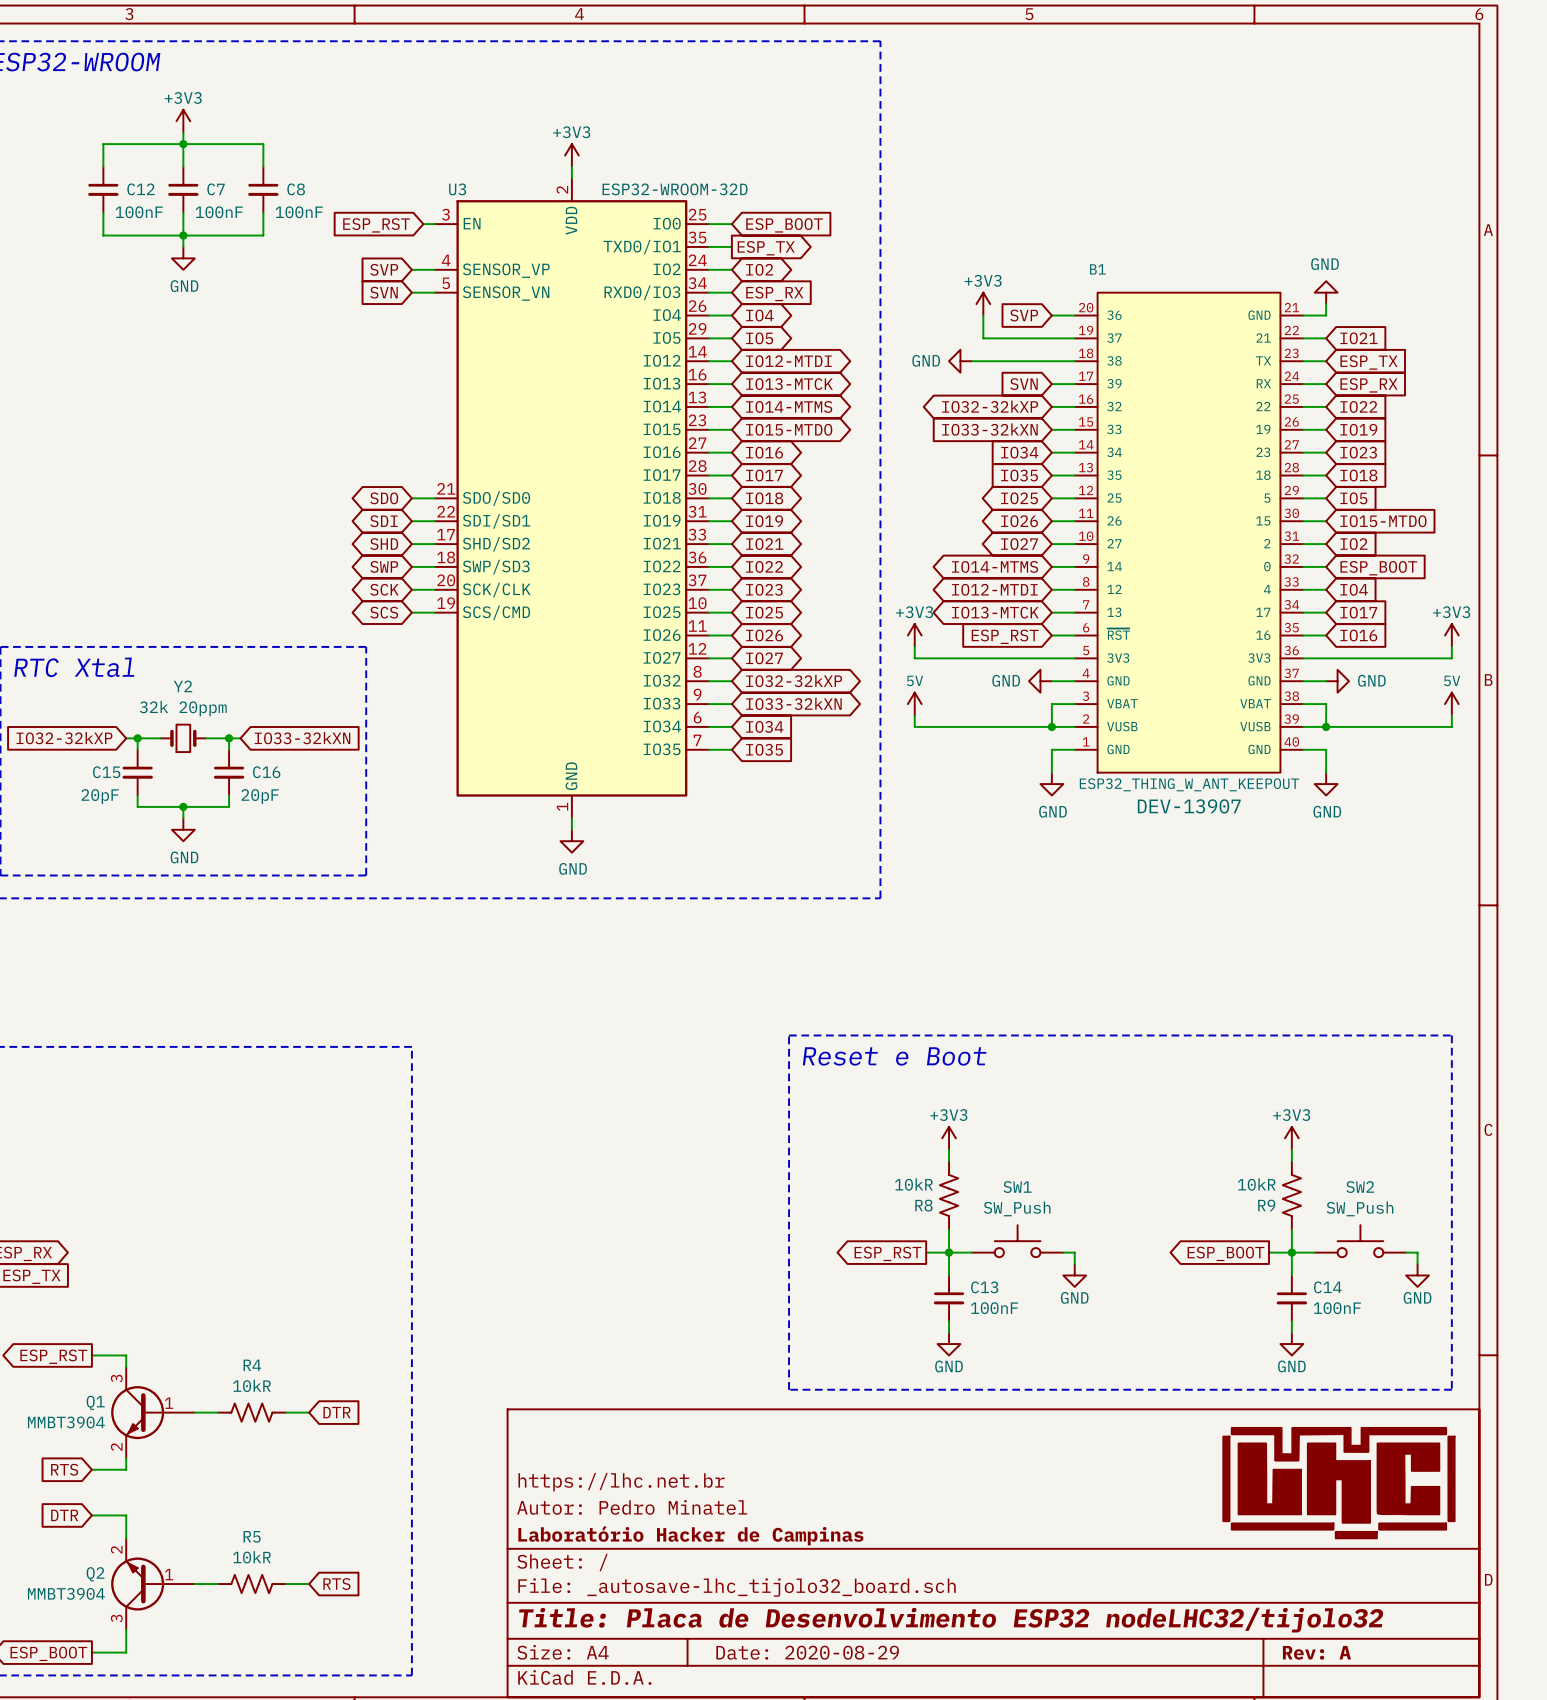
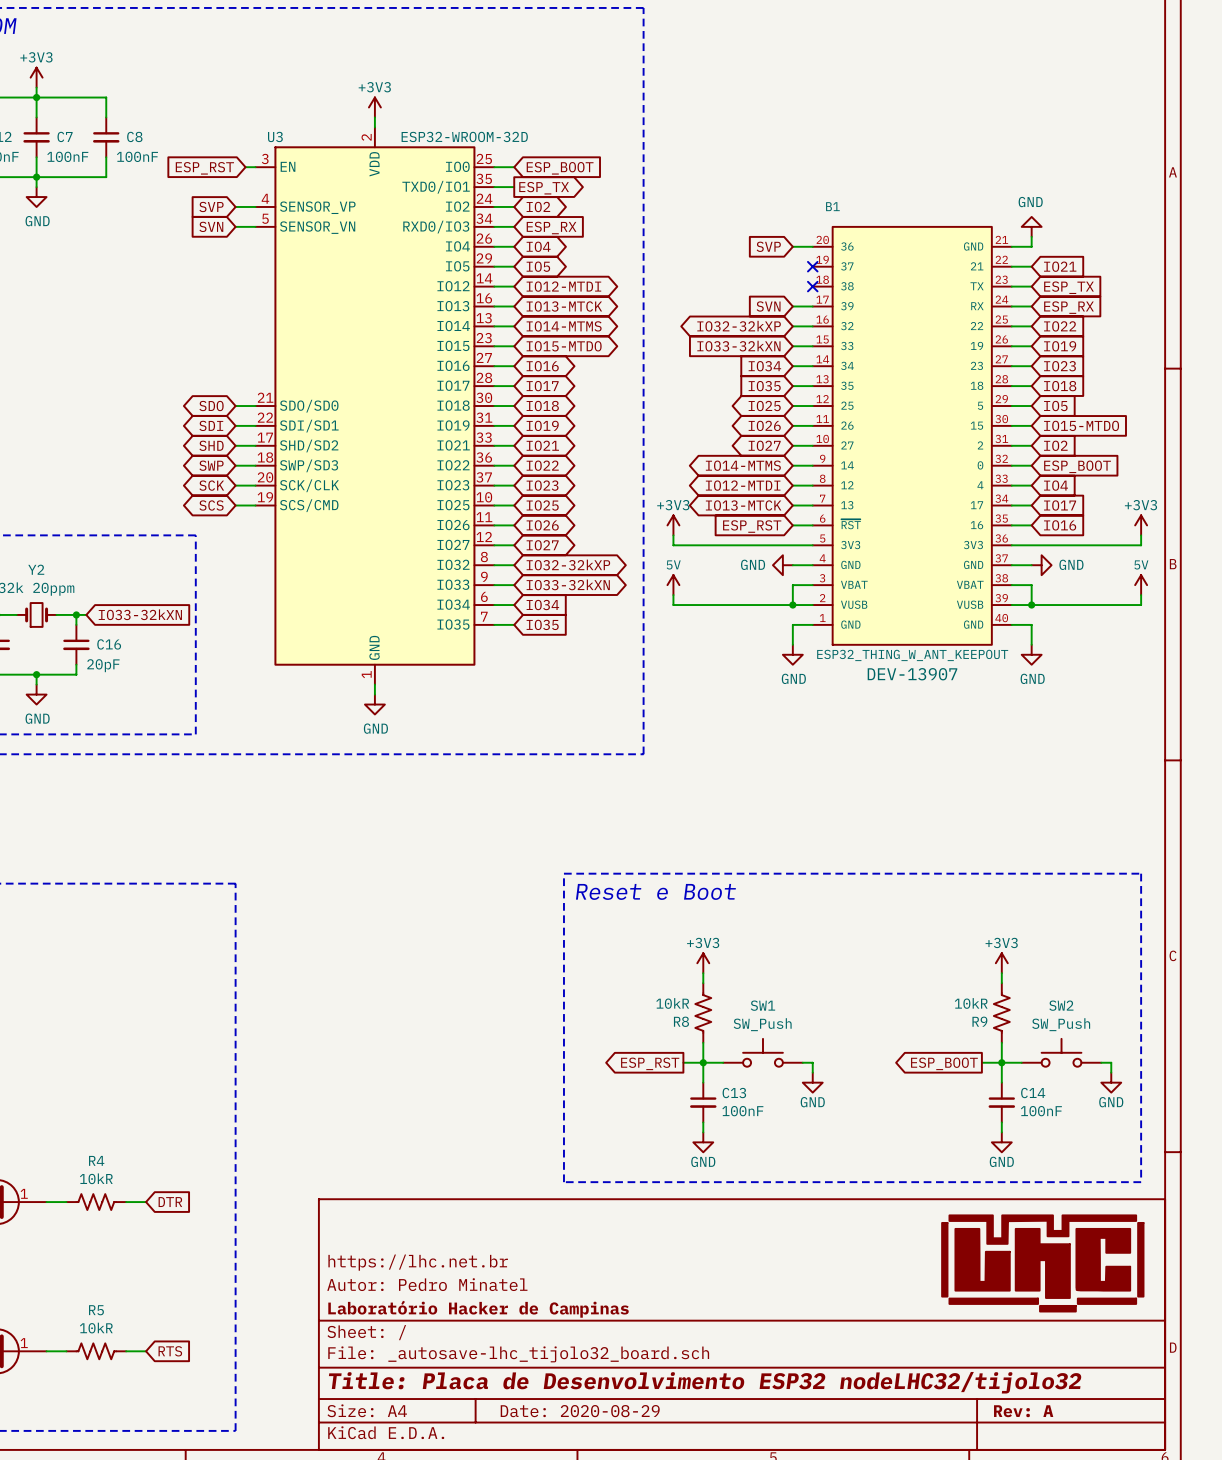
power symbol: +3V3 (983, 304) -> none
wire: (983, 315) (983, 338) (1074, 338) -> none
no-connect mark: none -> (812, 266)
power symbol: GND (960, 361) -> none
wire: (971, 361) (1074, 361) -> none
no-connect mark: none -> (812, 286)

